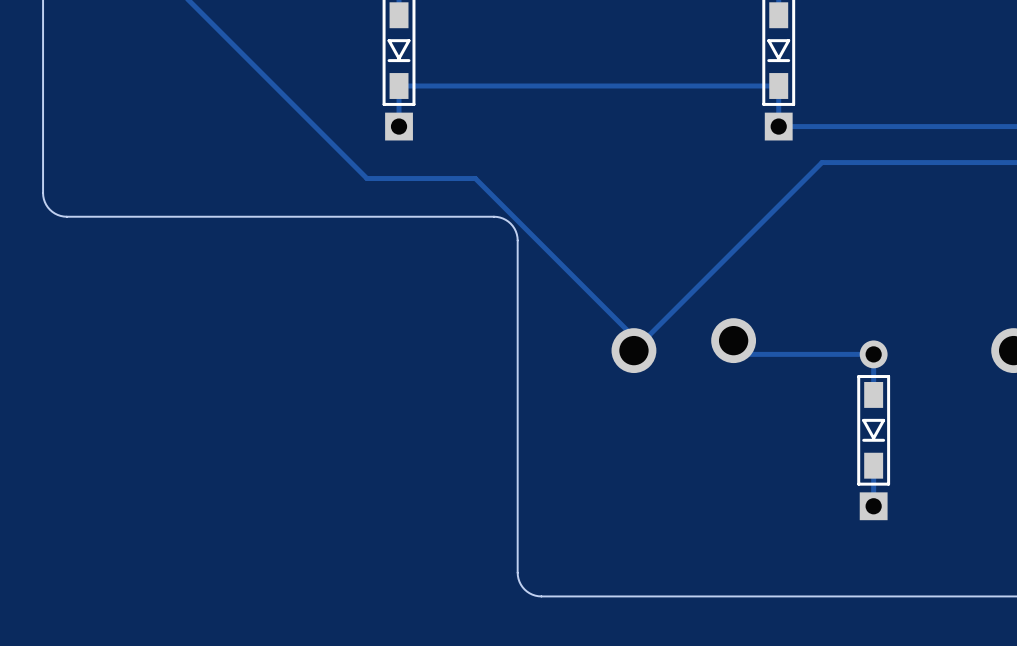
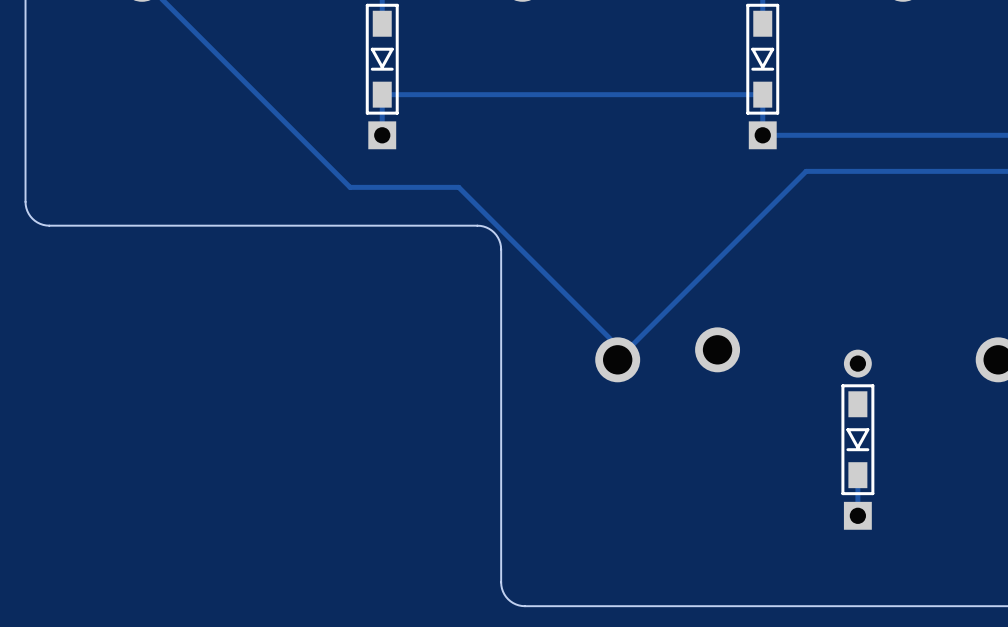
track: (733, 340) (747, 354) (873, 354) (873, 394) -> none

